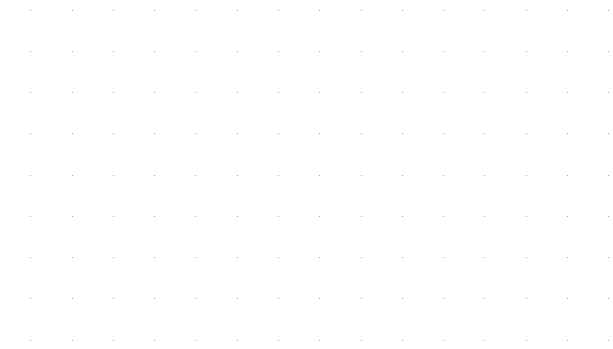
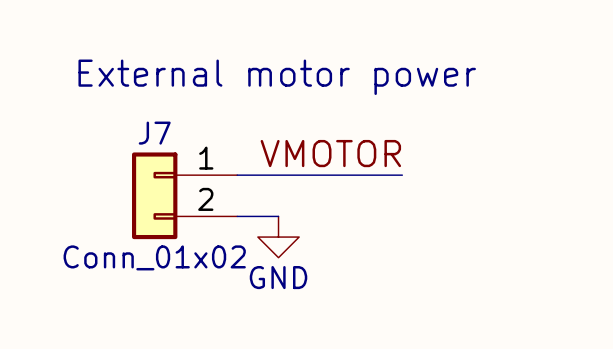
text: none -> External motor power (277, 77)
label: none -> VMOTOR (330, 153)
wire: none -> (237, 175) (402, 175)
J7: none -> Conn_01x02 (184, 195)
wire: none -> (237, 216) (278, 216)
power symbol: none -> GND (278, 237)

